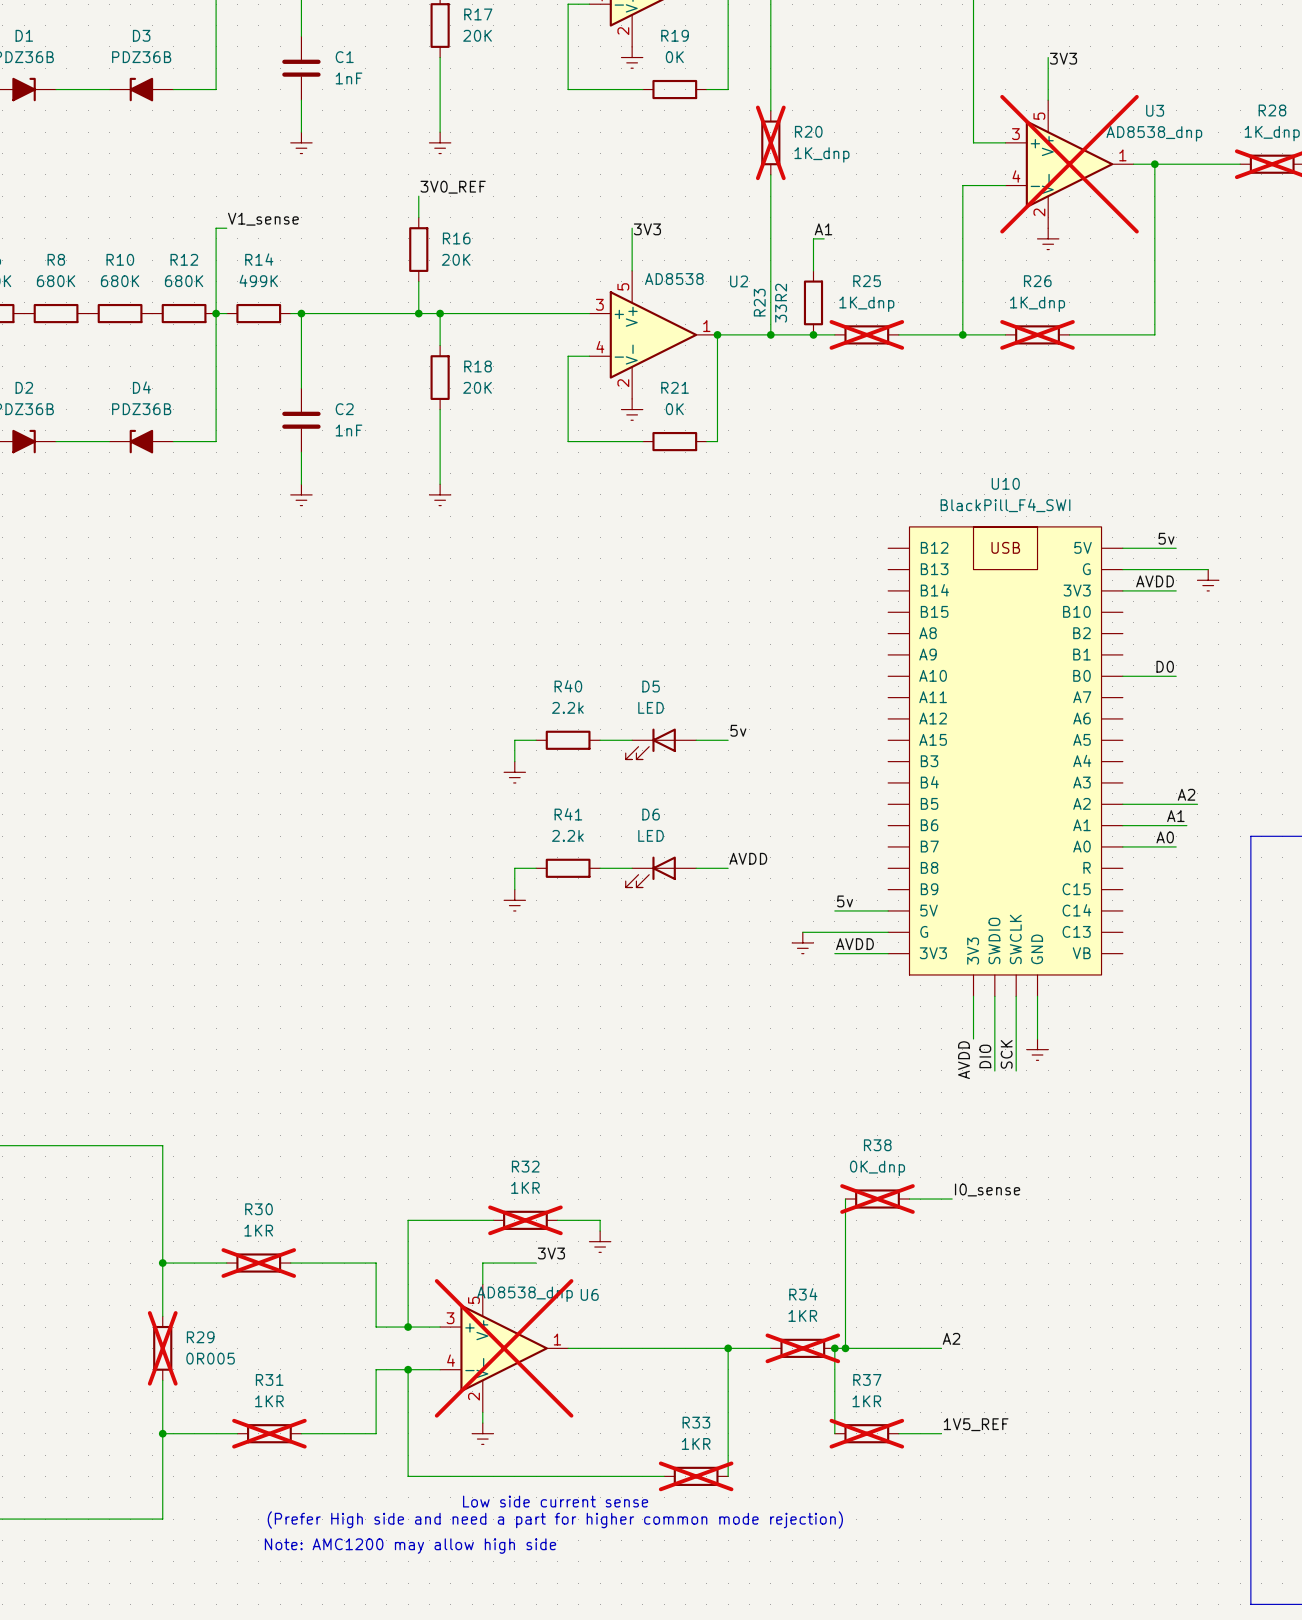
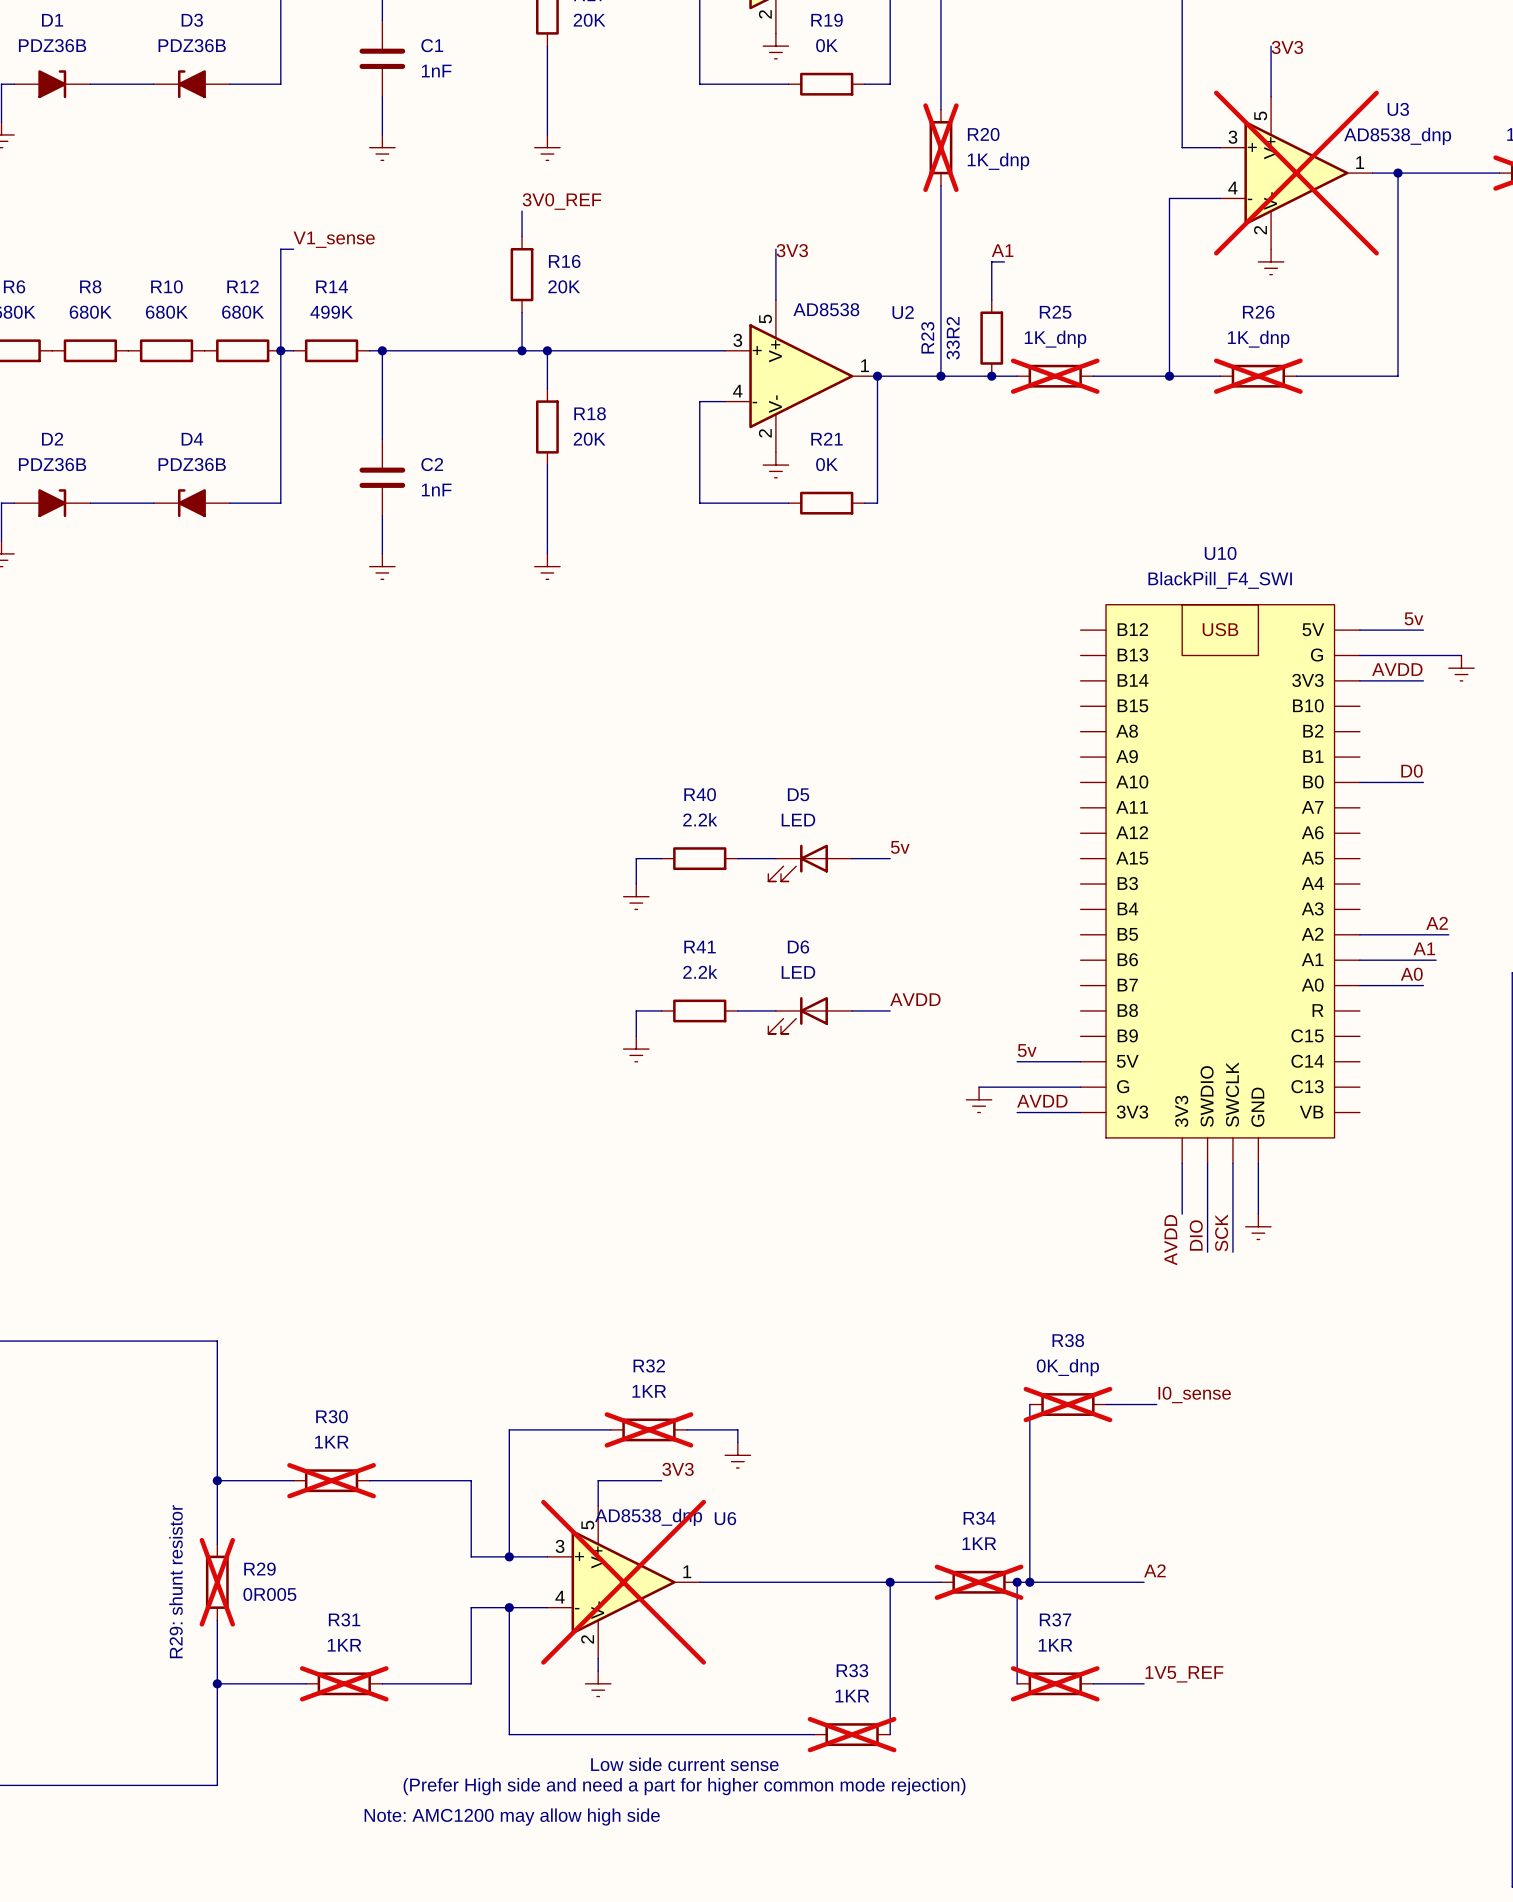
text: none -> R29: shunt resistor (175, 1581)

